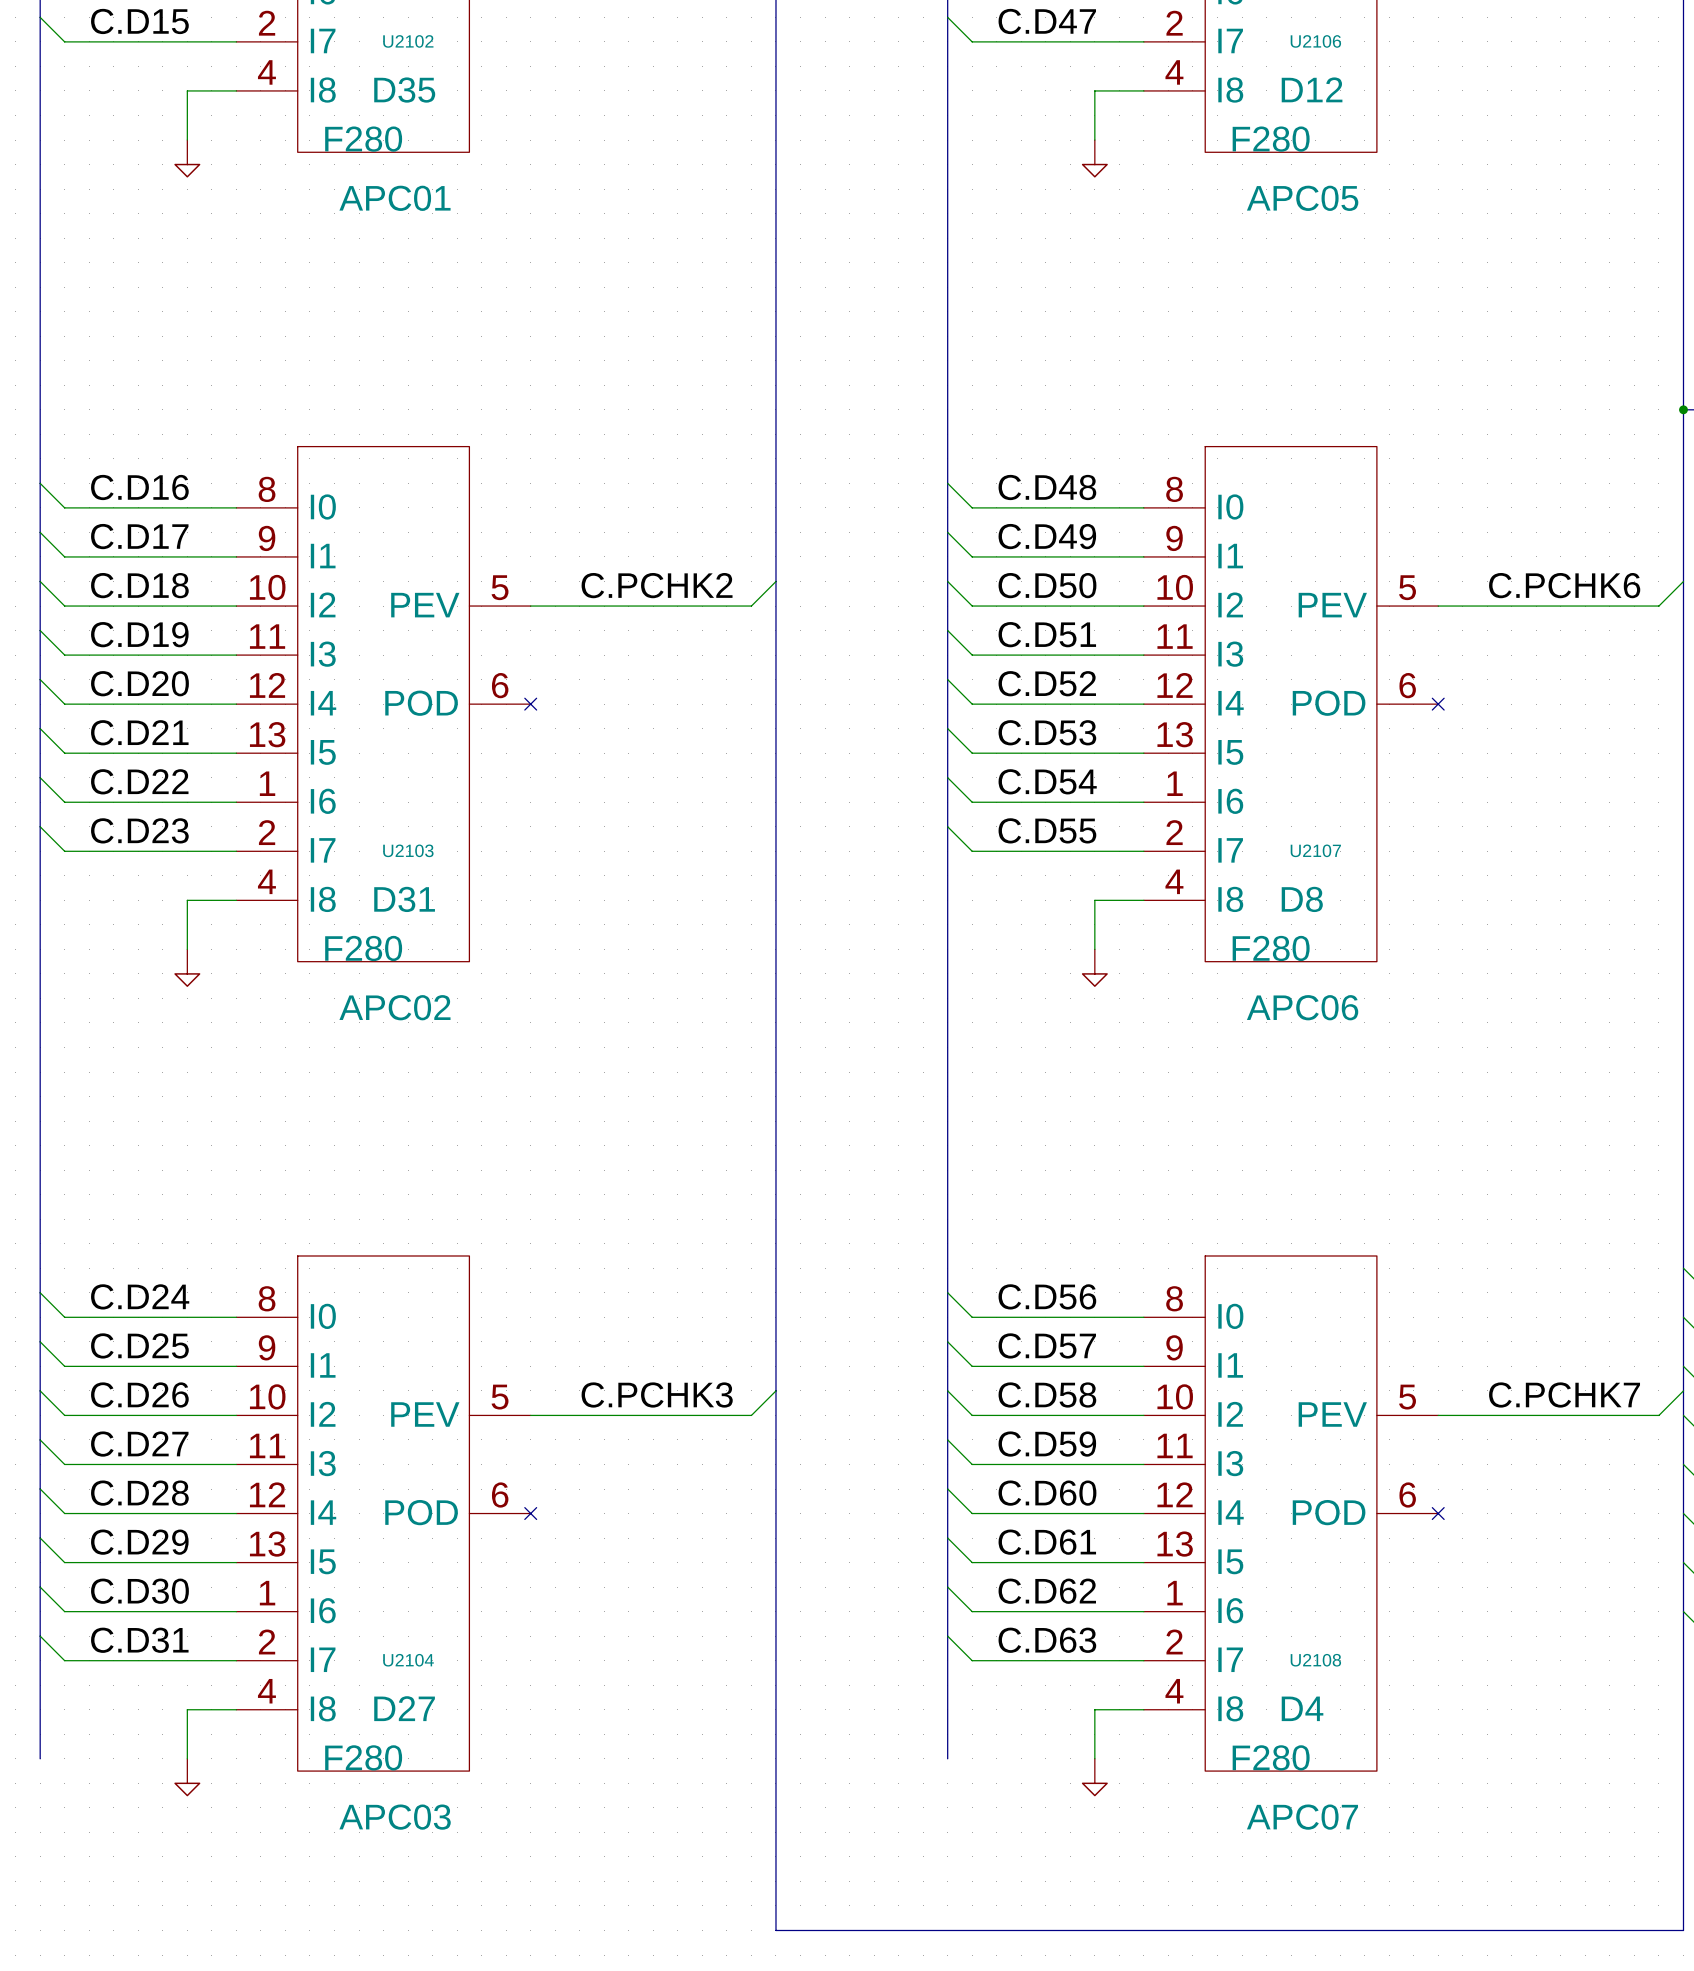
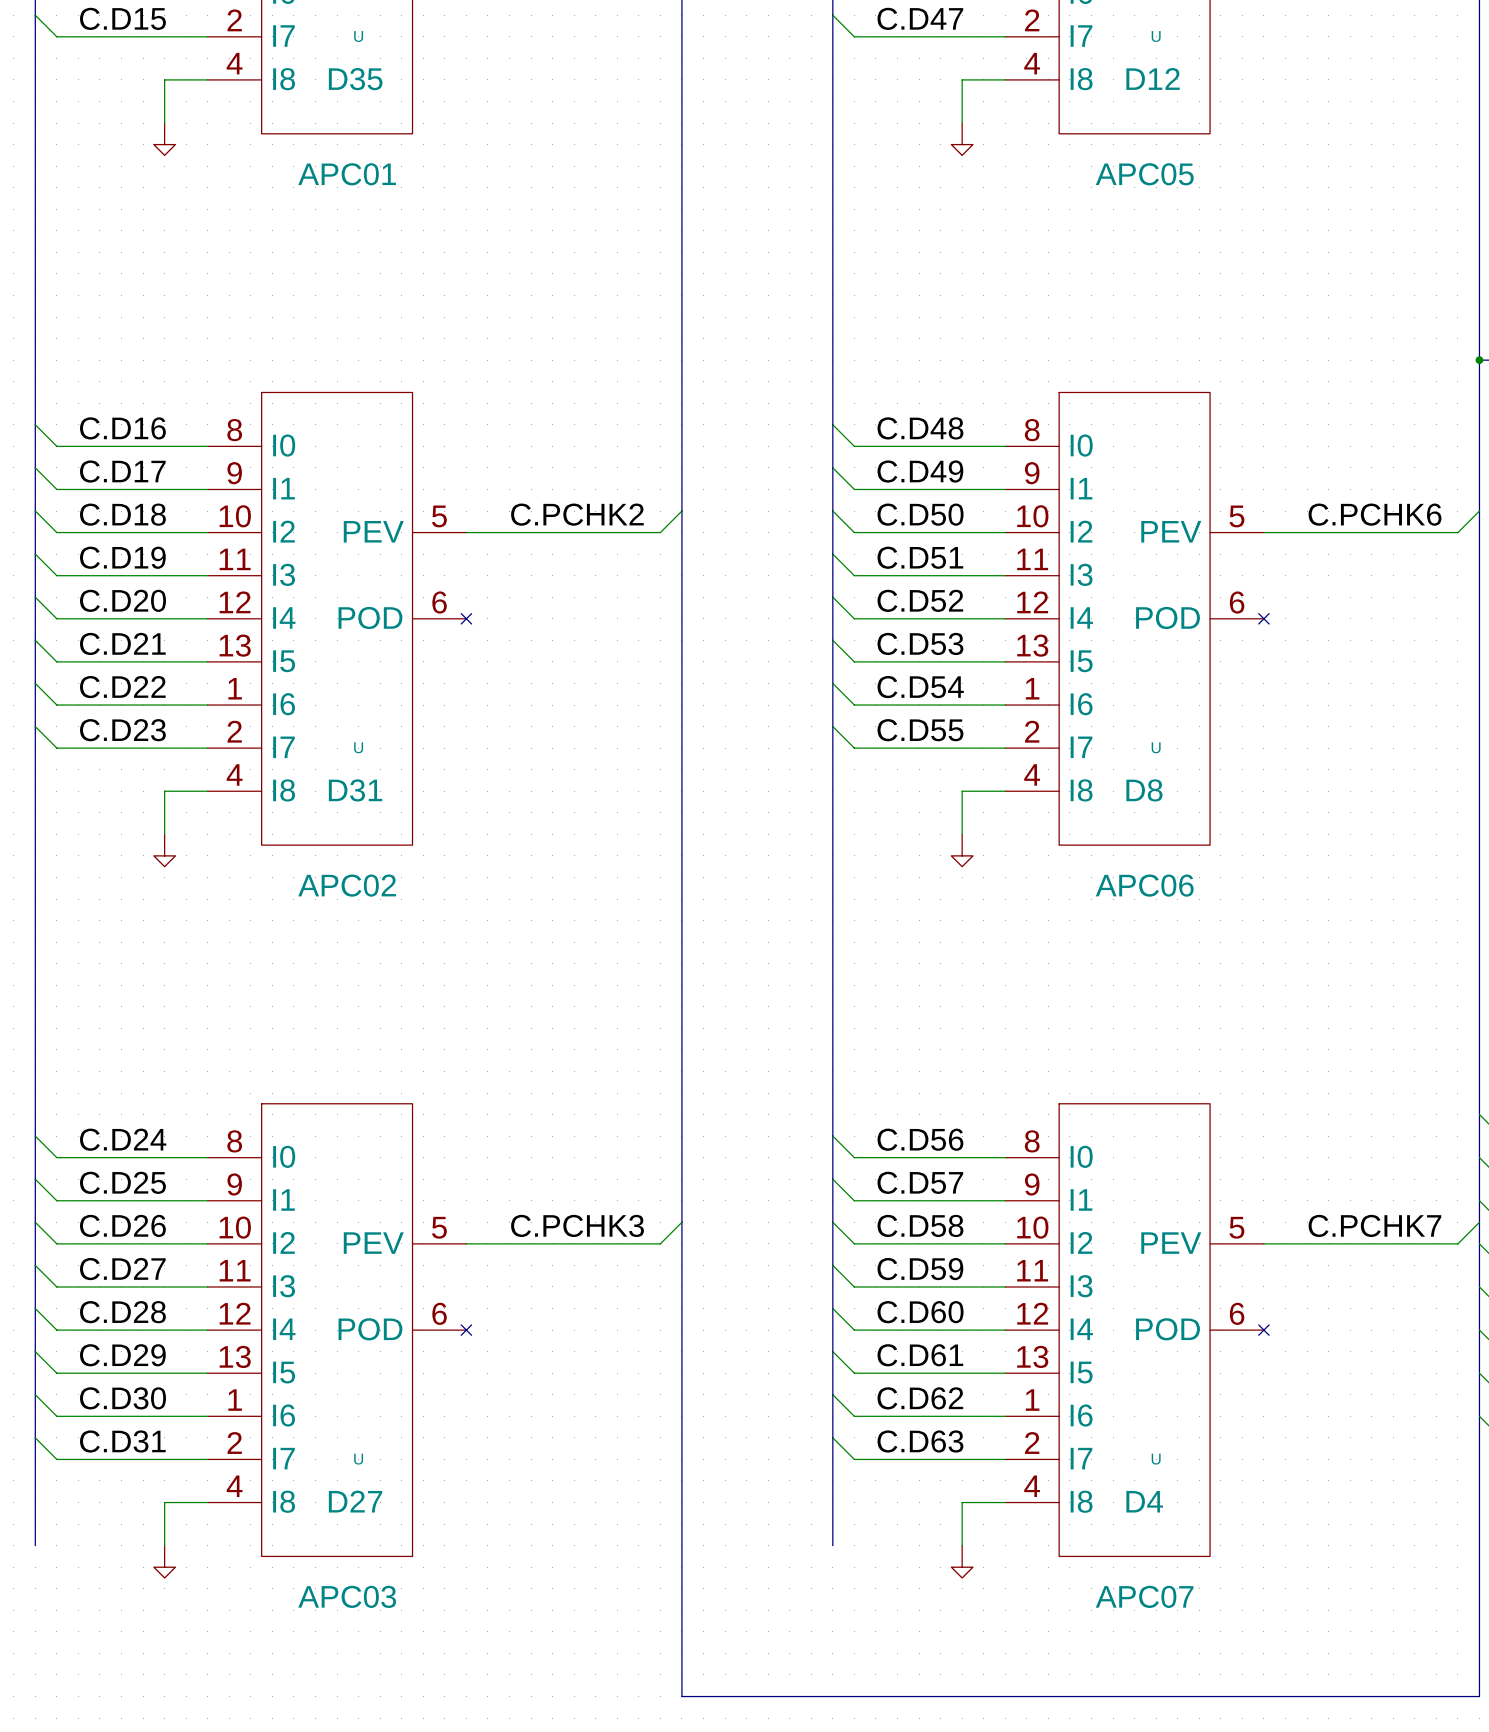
U2102 name: U2102 (408, 41) -> U (358, 36)
U2106 name: U2106 (1315, 41) -> U (1156, 36)
U2102 value: F280 (363, 139) -> none
U2106 value: F280 (1271, 139) -> none
U2103 name: U2103 (408, 850) -> U (358, 747)
U2107 name: U2107 (1315, 850) -> U (1156, 747)
U2103 value: F280 (363, 948) -> none
U2107 value: F280 (1271, 948) -> none
U2104 name: U2104 (408, 1660) -> U (358, 1459)
U2108 name: U2108 (1315, 1660) -> U (1156, 1459)
U2104 value: F280 (363, 1757) -> none
U2108 value: F280 (1271, 1757) -> none

